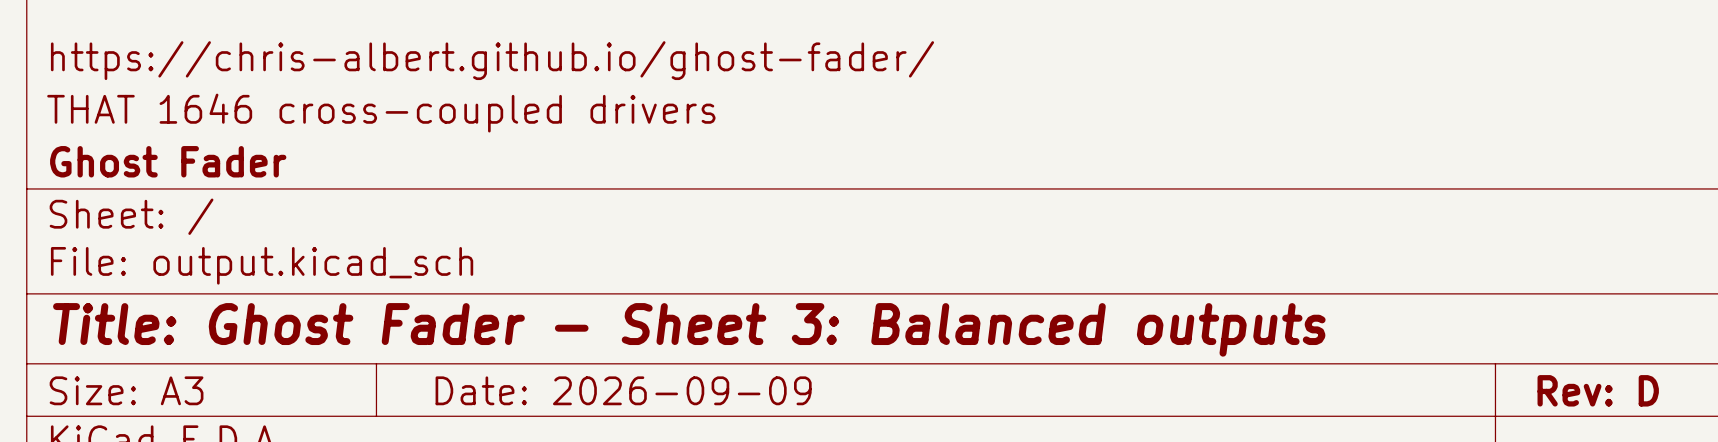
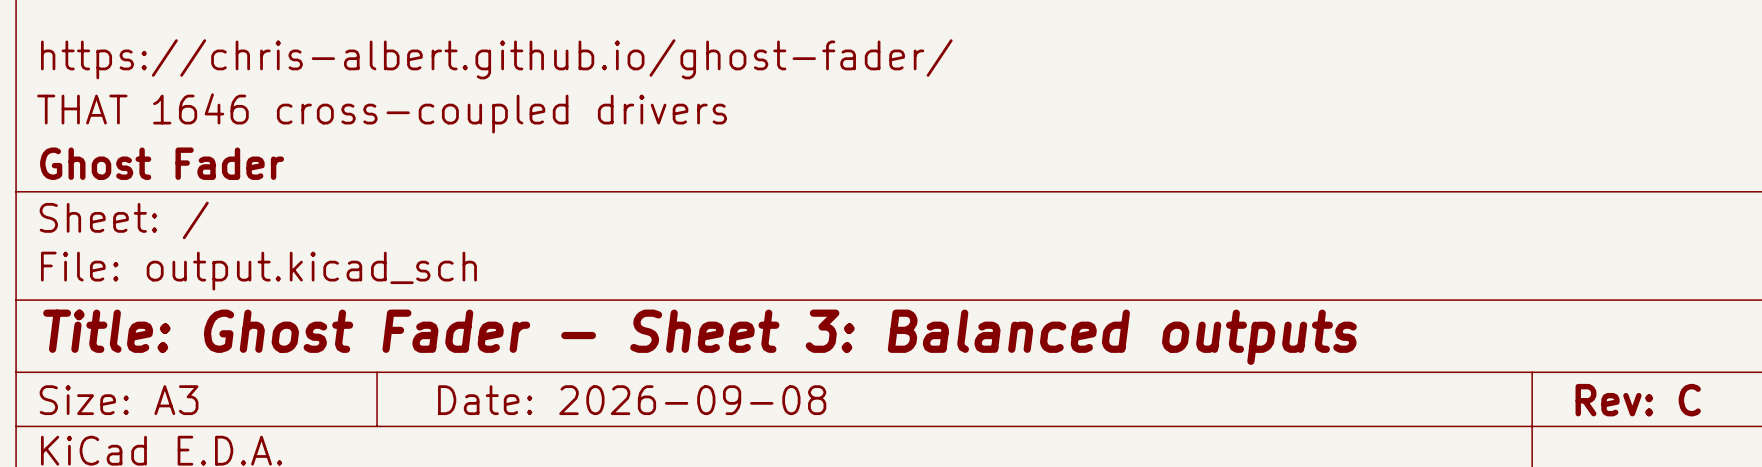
title block: Date: 2026-09-09 (623, 390) -> Date: 2026-09-08 (632, 400)
title block: Rev: D (1598, 390) -> Rev: C (1638, 400)

